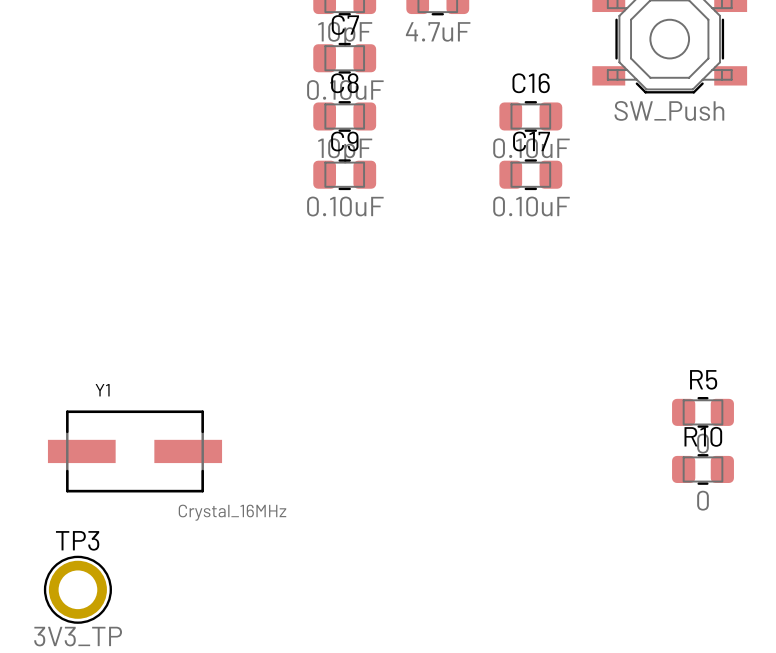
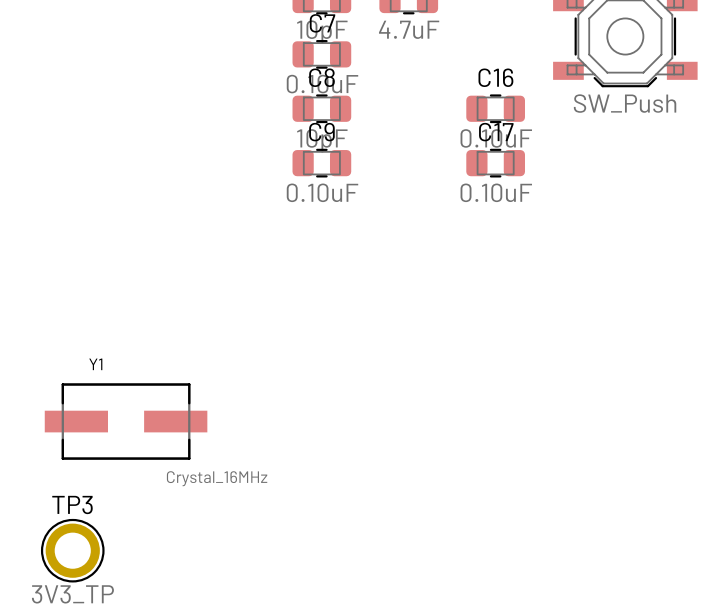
R5: 0 (703, 412) -> none
R10: 0 (703, 469) -> none

